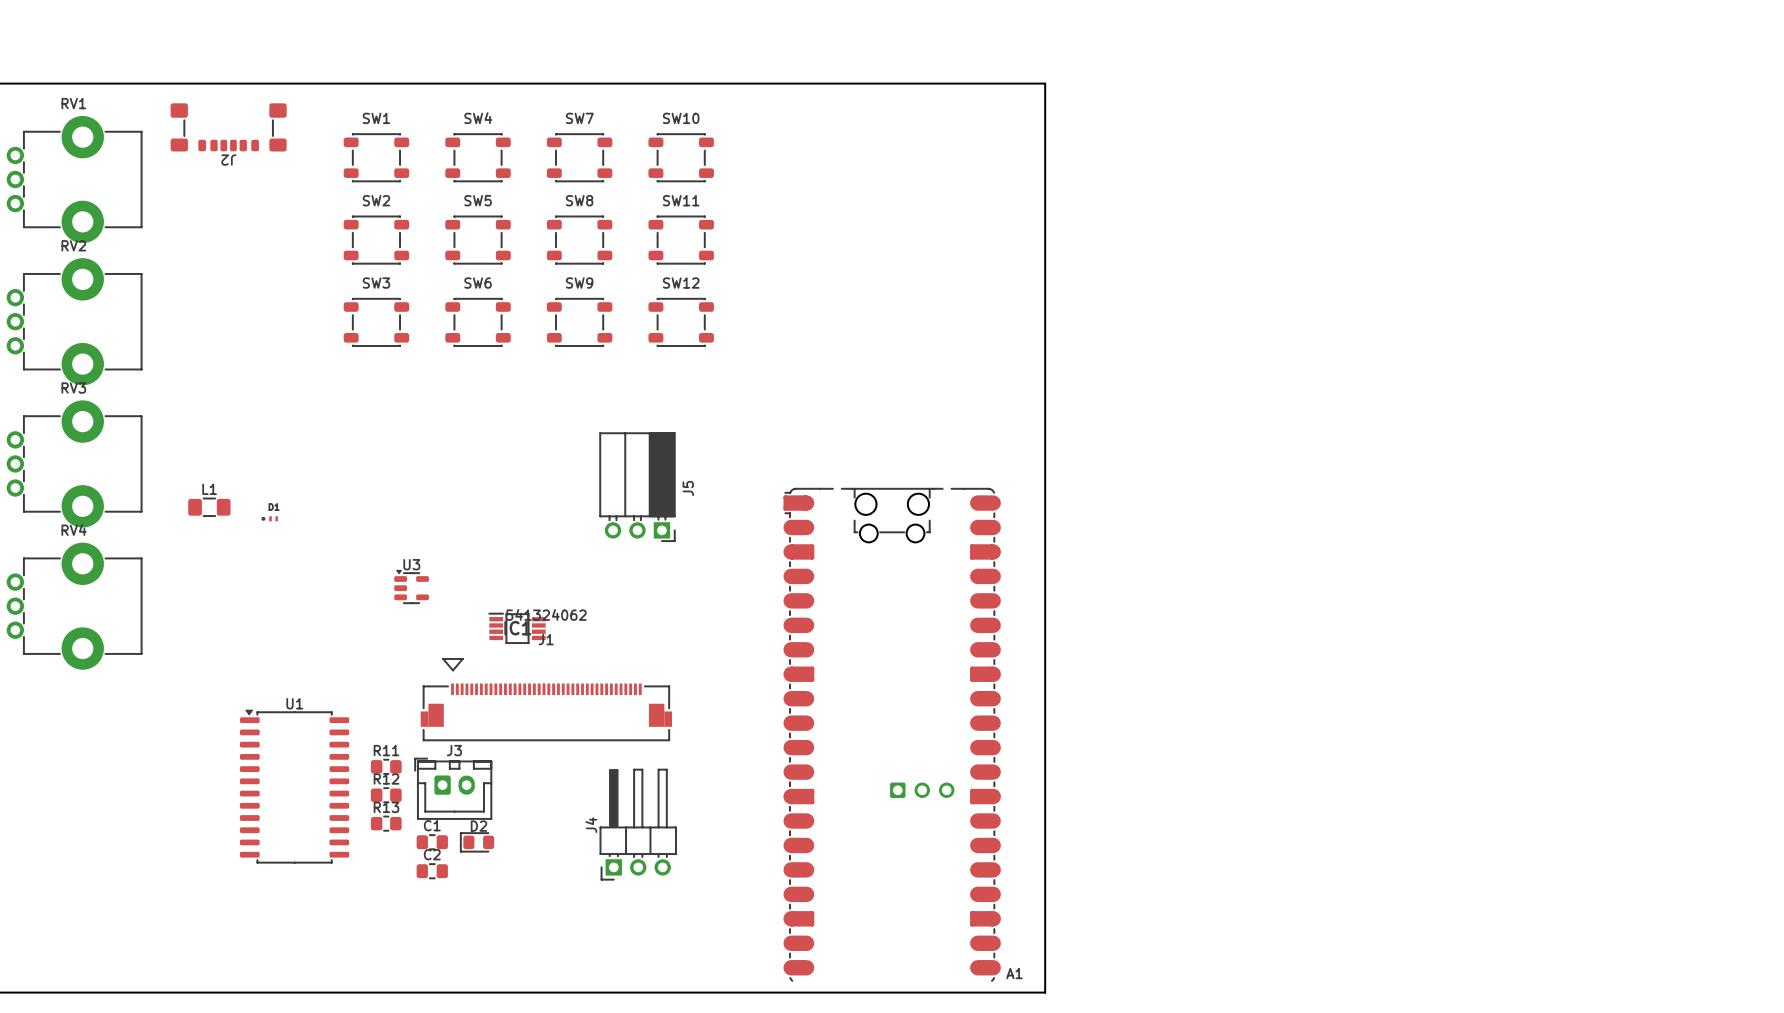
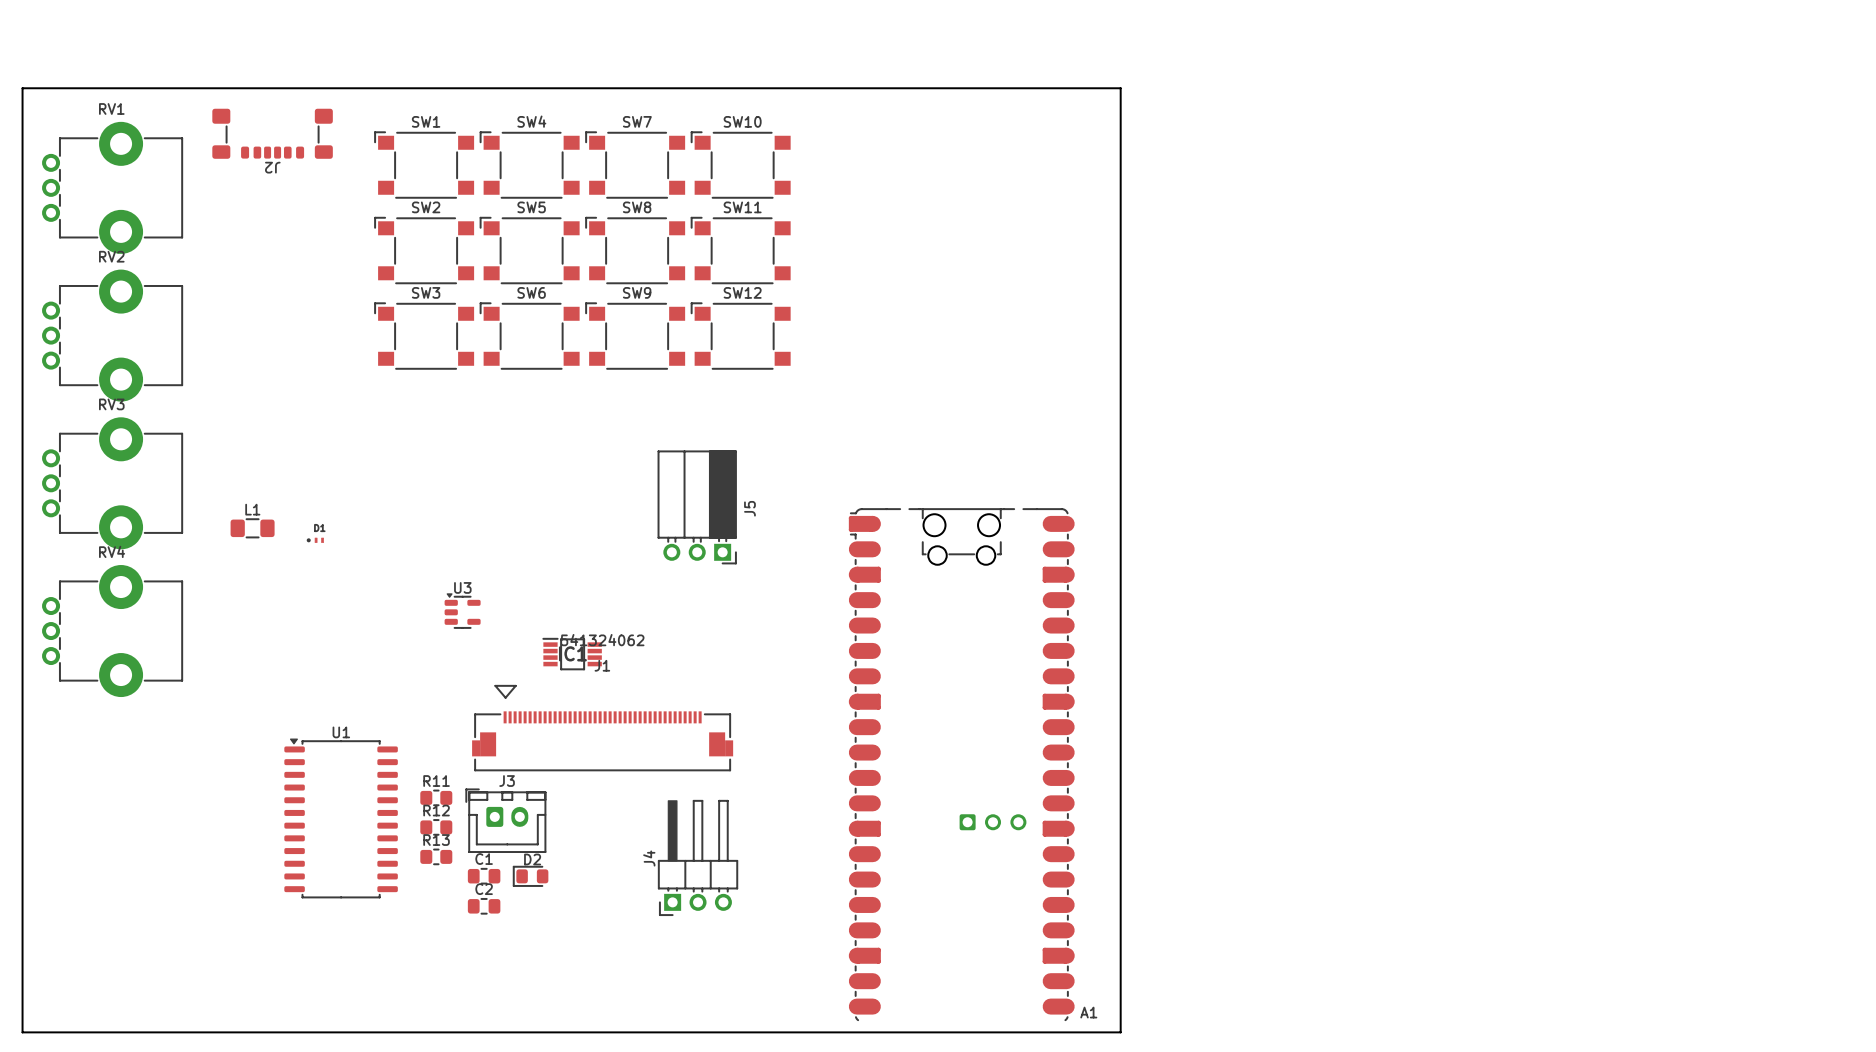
SW1 footprint: [343, 133, 410, 182] -> [374, 131, 475, 199]
SW4 footprint: [445, 133, 511, 182] -> [480, 131, 580, 199]
SW7 footprint: [546, 133, 613, 182] -> [585, 131, 686, 199]
SW10 footprint: [648, 133, 714, 182] -> [691, 131, 791, 199]
SW2 footprint: [343, 215, 410, 265] -> [374, 217, 475, 284]
SW5 footprint: [445, 215, 511, 265] -> [480, 217, 580, 284]
SW8 footprint: [546, 215, 613, 265] -> [585, 217, 686, 284]
SW11 footprint: [648, 215, 714, 265] -> [691, 217, 791, 284]
SW3 footprint: [343, 298, 410, 347] -> [374, 302, 475, 370]
SW6 footprint: [445, 298, 511, 347] -> [480, 302, 580, 370]
SW9 footprint: [546, 298, 613, 347] -> [585, 302, 686, 370]
SW12 footprint: [648, 298, 714, 347] -> [691, 302, 791, 370]

